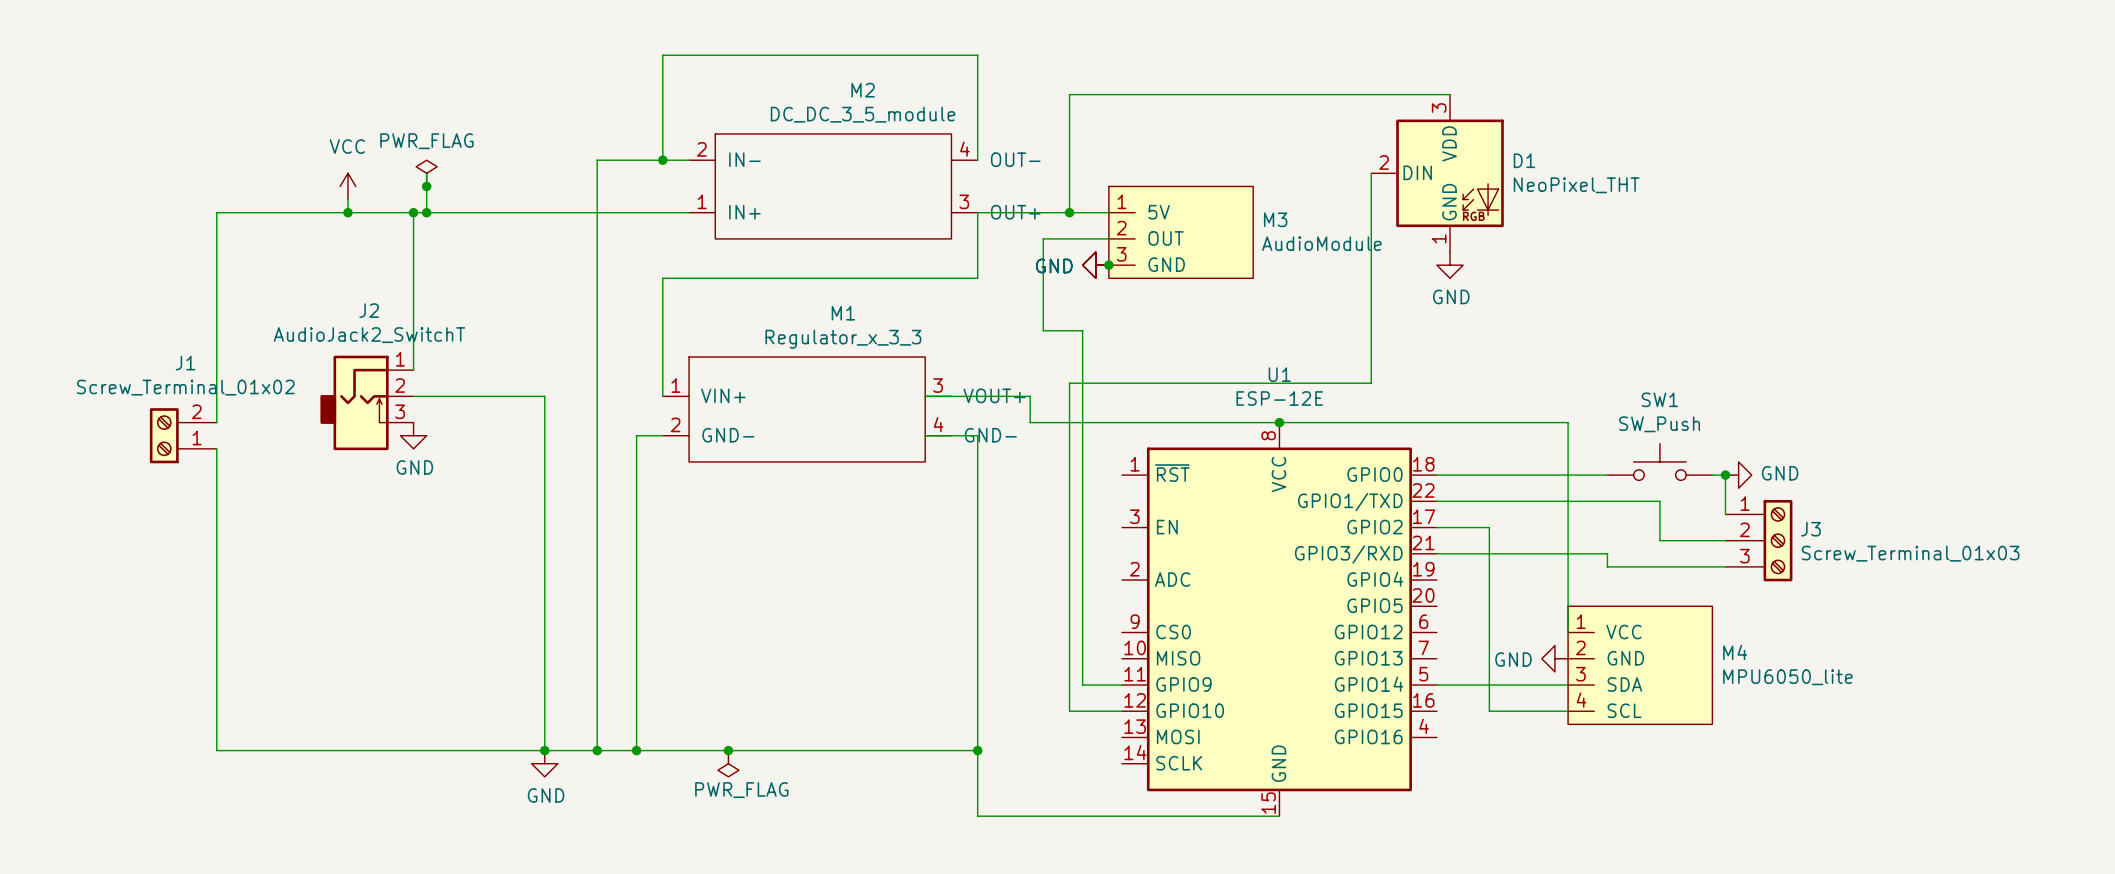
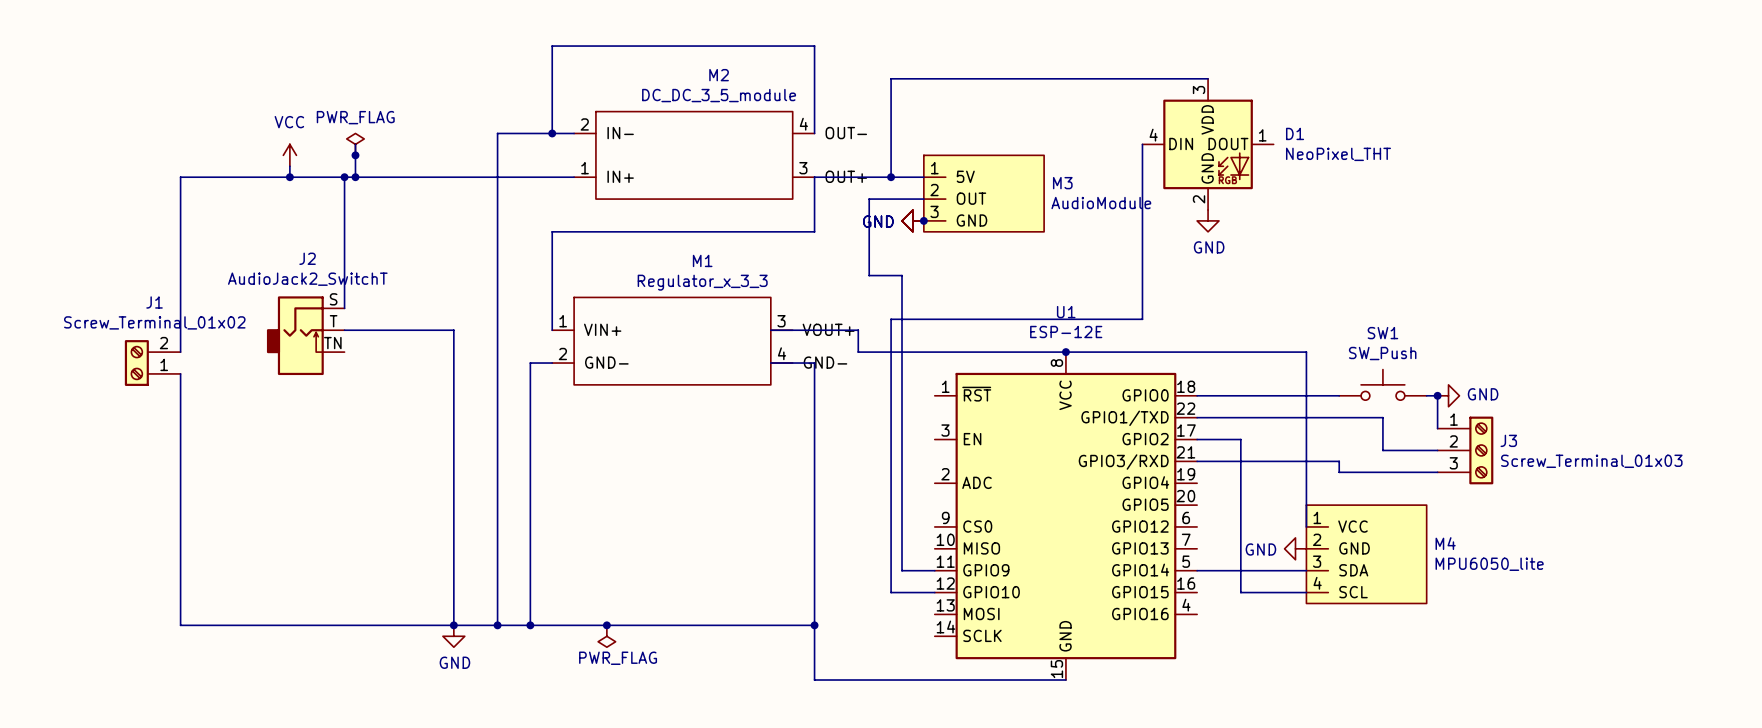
D1 symbol: [1371, 94, 1504, 253] -> [1142, 78, 1274, 210]
J2 pin number: 1 (400, 359) -> S (333, 299)
J2 pin number: 2 (400, 385) -> T (333, 321)
J2 pin number: 3 (400, 411) -> TN (332, 343)
power symbol: GND (413, 435) -> none

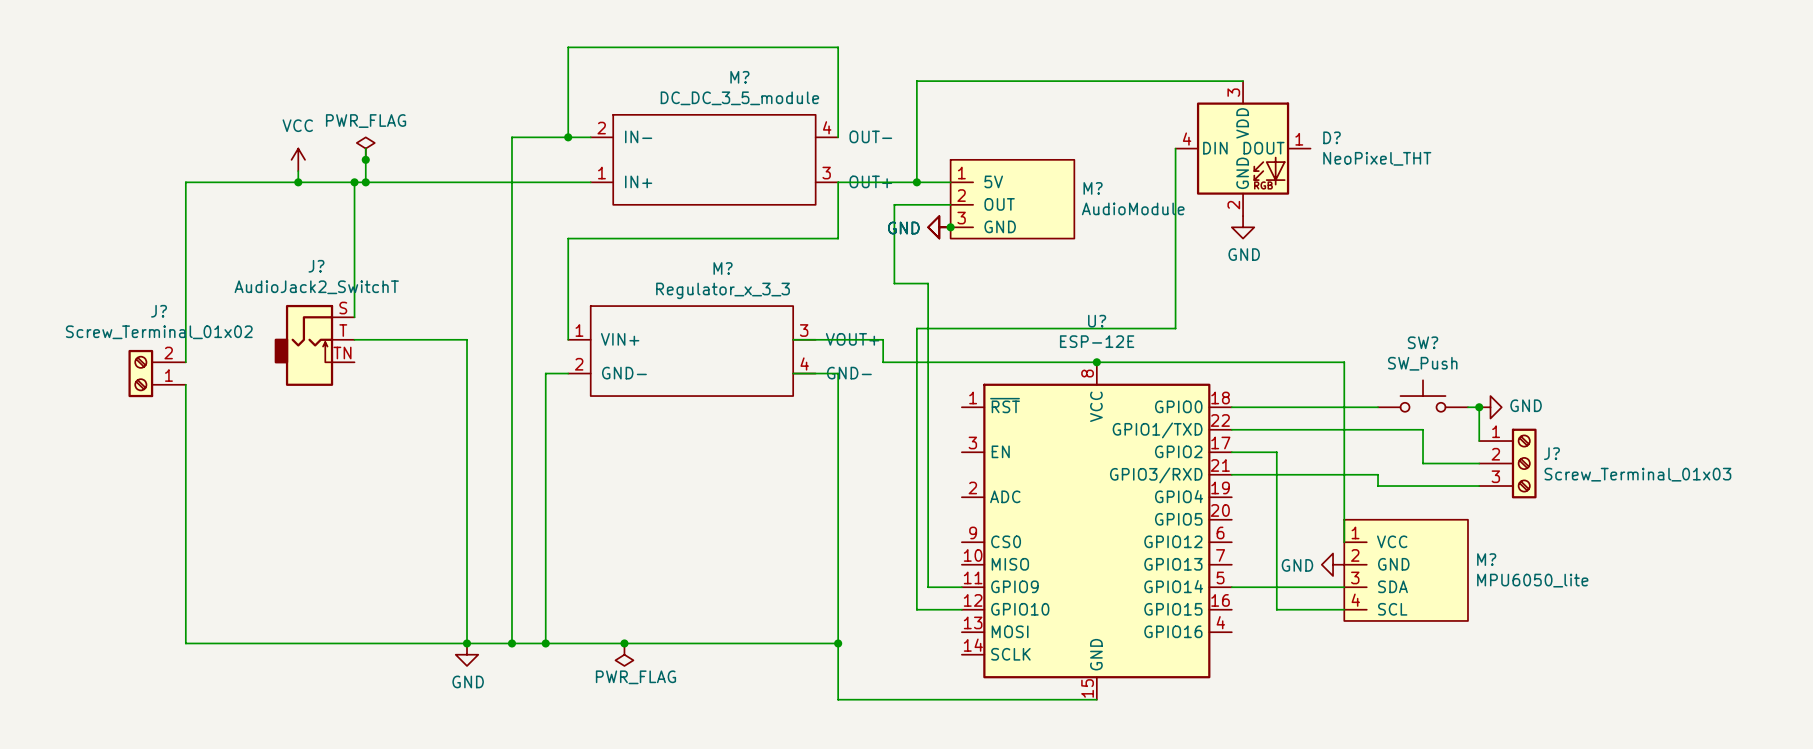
M2 name: M2 (719, 75) -> M? (739, 77)
D1 name: D1 (1295, 133) -> D? (1332, 137)
M3 name: M3 (1062, 183) -> M? (1093, 188)
J2 name: J2 (307, 258) -> J? (316, 266)
M1 name: M1 (702, 260) -> M? (723, 268)
J1 name: J1 (154, 302) -> J? (159, 311)
U1 name: U1 (1066, 312) -> U? (1097, 321)
SW1 name: SW1 (1382, 333) -> SW? (1423, 342)
J3 name: J3 (1508, 440) -> J? (1551, 453)
M4 name: M4 (1445, 543) -> M? (1486, 559)

